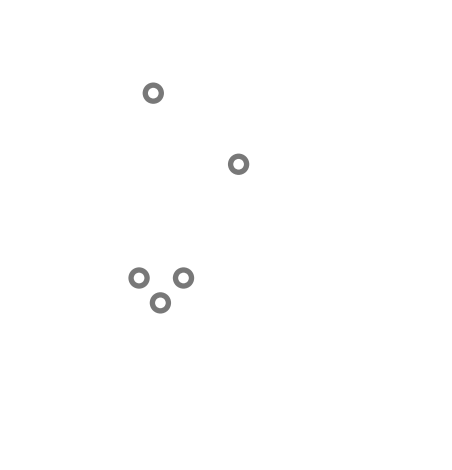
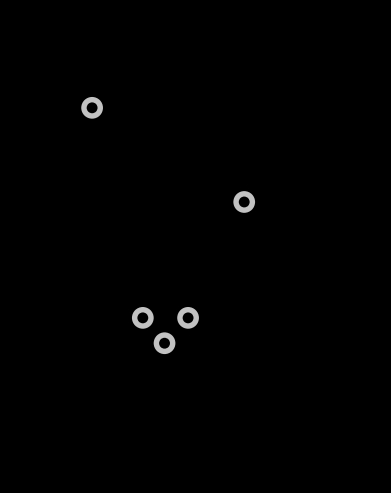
via position: (153, 93) -> (92, 107)

